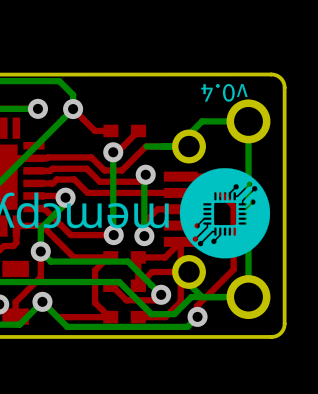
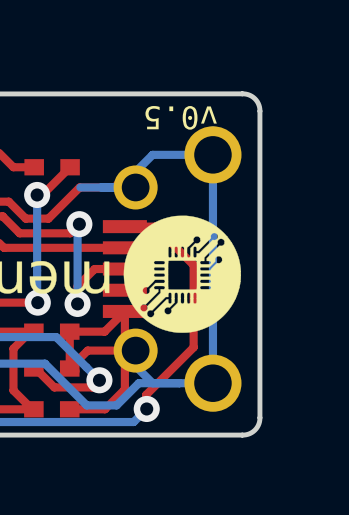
text: v0.4 (224, 92) -> v0.5 (181, 117)

